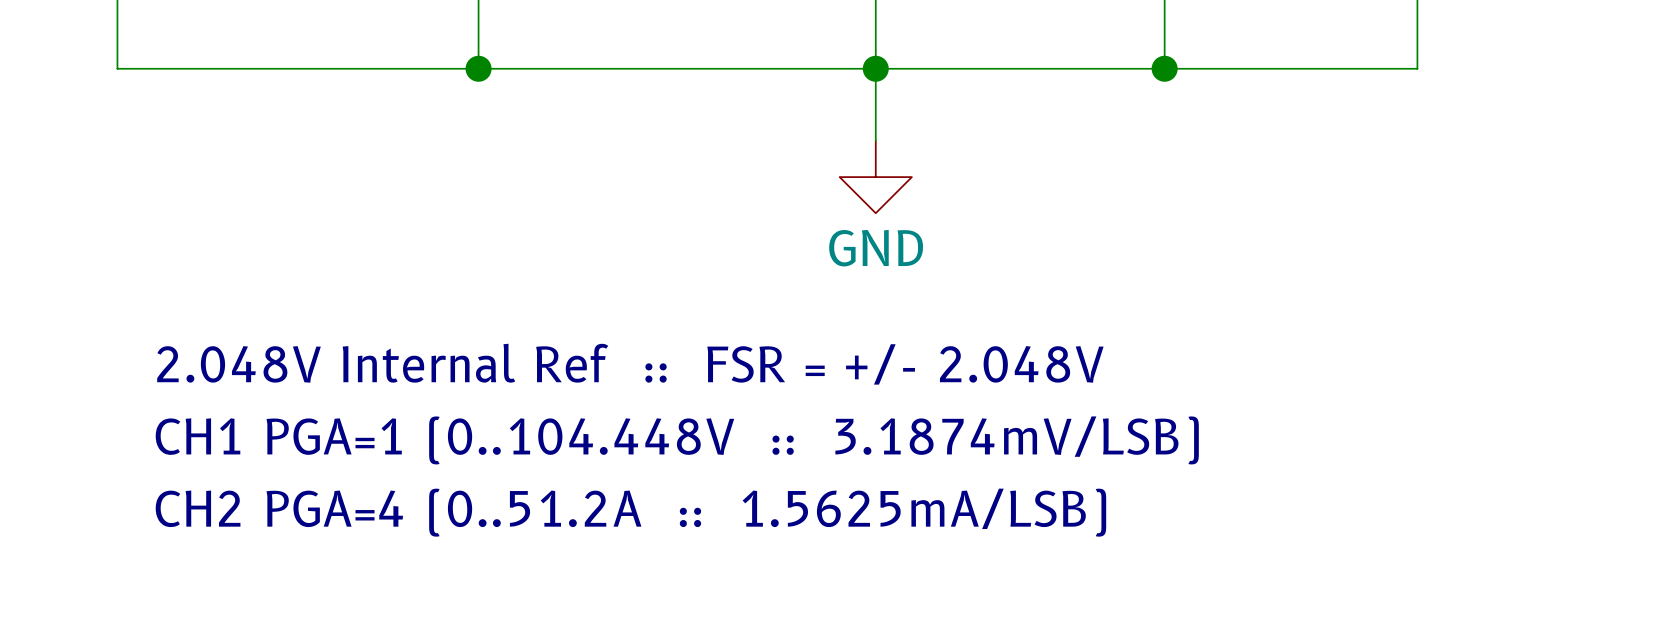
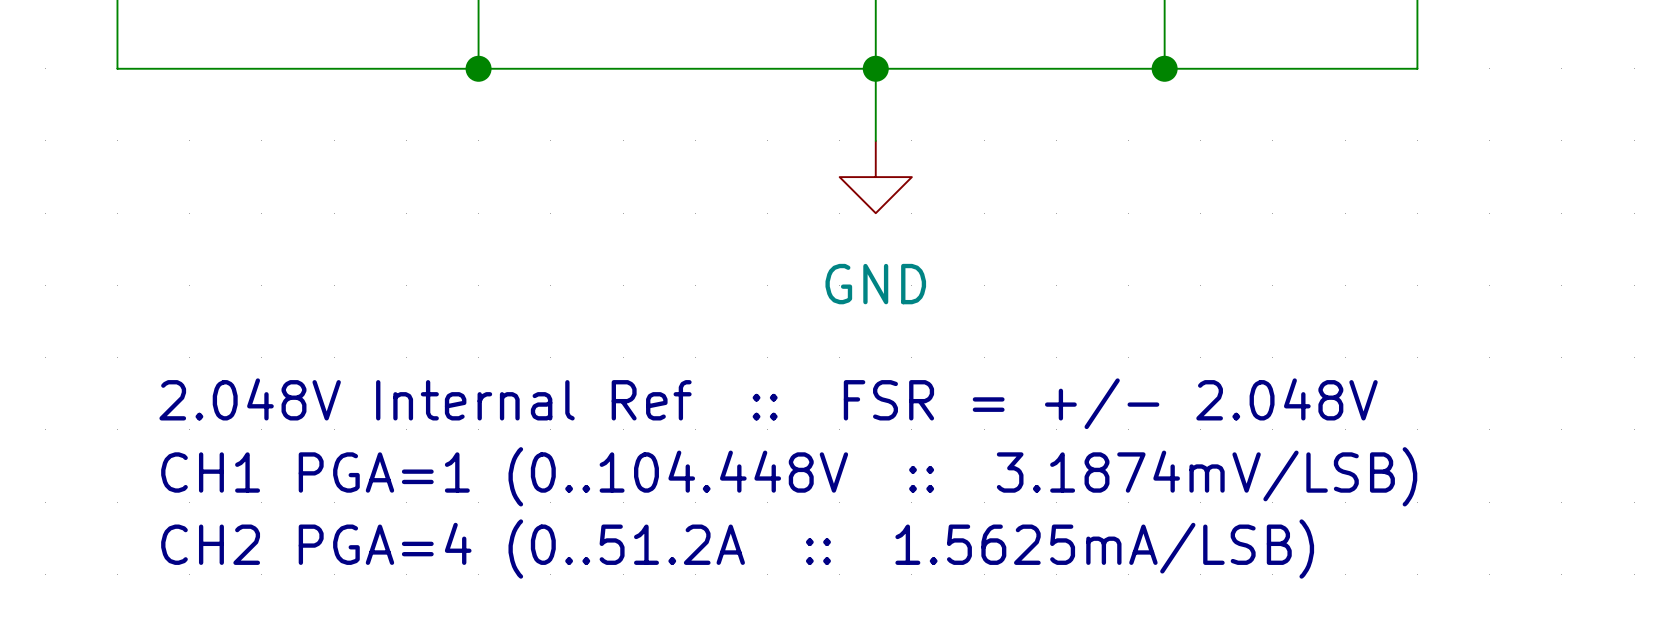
power symbol text position: GND (876, 248) -> GND (875, 284)
text position: 2.048V Internal Ref :: FSR = +/- 2.048V (630, 364) -> 2.048V Internal Ref :: FSR = +/- 2.048V (768, 403)
text position: CH1 PGA=1 (0..104.448V :: 3.1874mV/LSB) (677, 440) -> CH1 PGA=1 (0..104.448V :: 3.1874mV/LSB) (789, 476)
text position: CH2 PGA=4 (0..51.2A :: 1.5625mA/LSB) (630, 512) -> CH2 PGA=4 (0..51.2A :: 1.5625mA/LSB) (737, 549)

